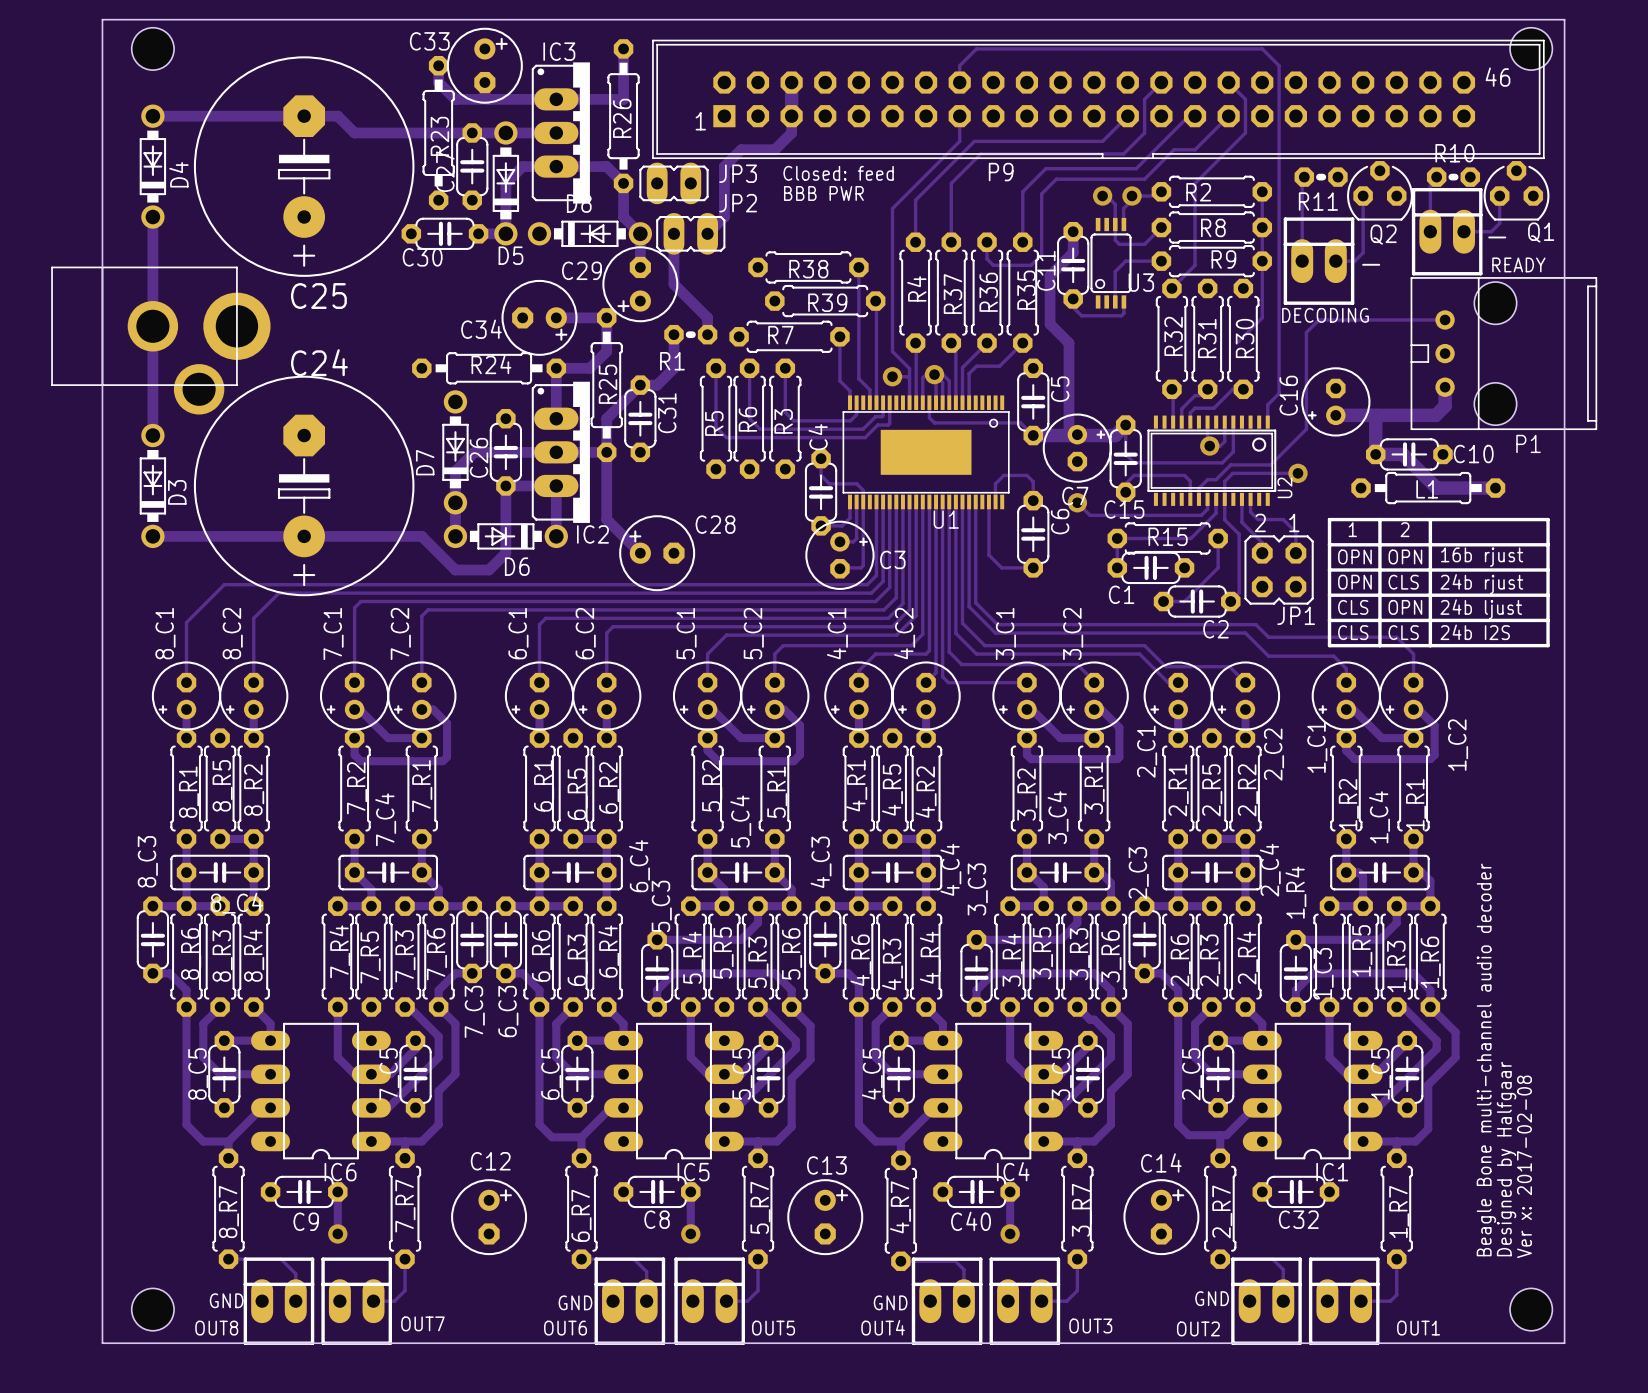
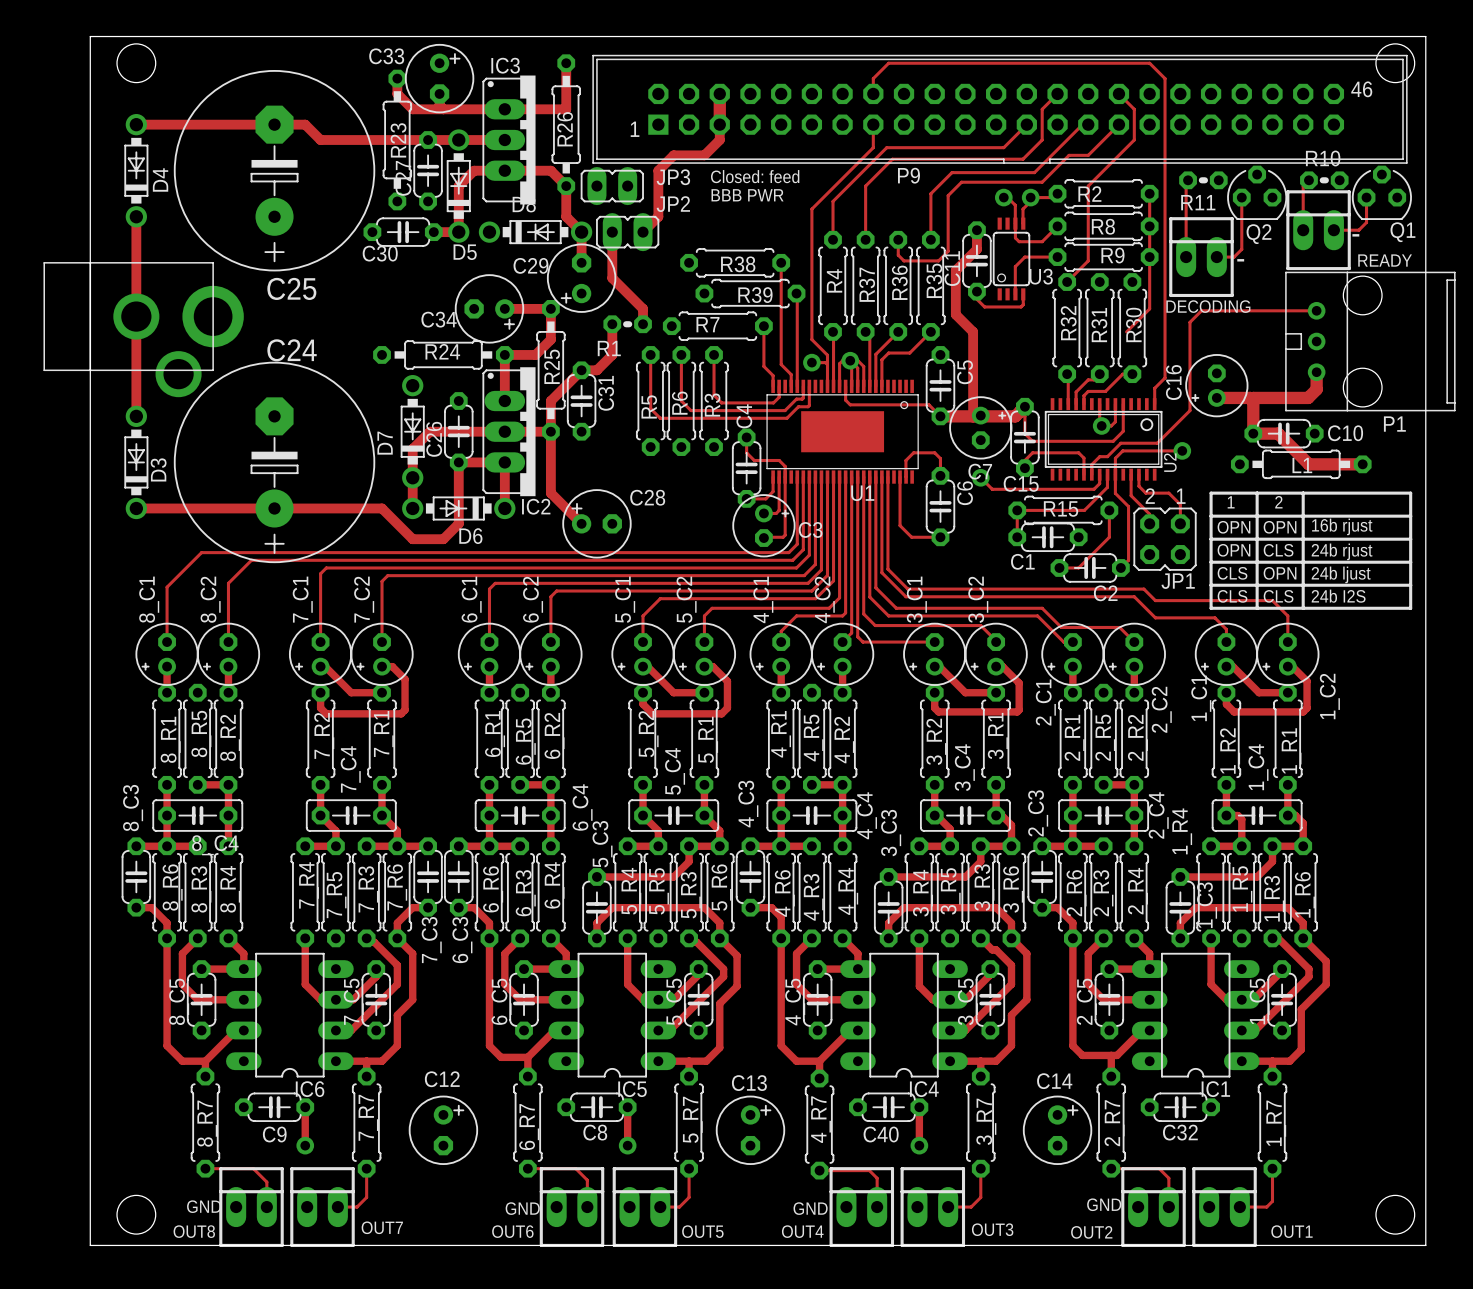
text: Beagle Bone multi-channel audio decoder (1486, 1059) -> none
text: Designed by Halfgaar (1506, 1159) -> none
text: Ver x: 2017-02-08 (1524, 1166) -> none

